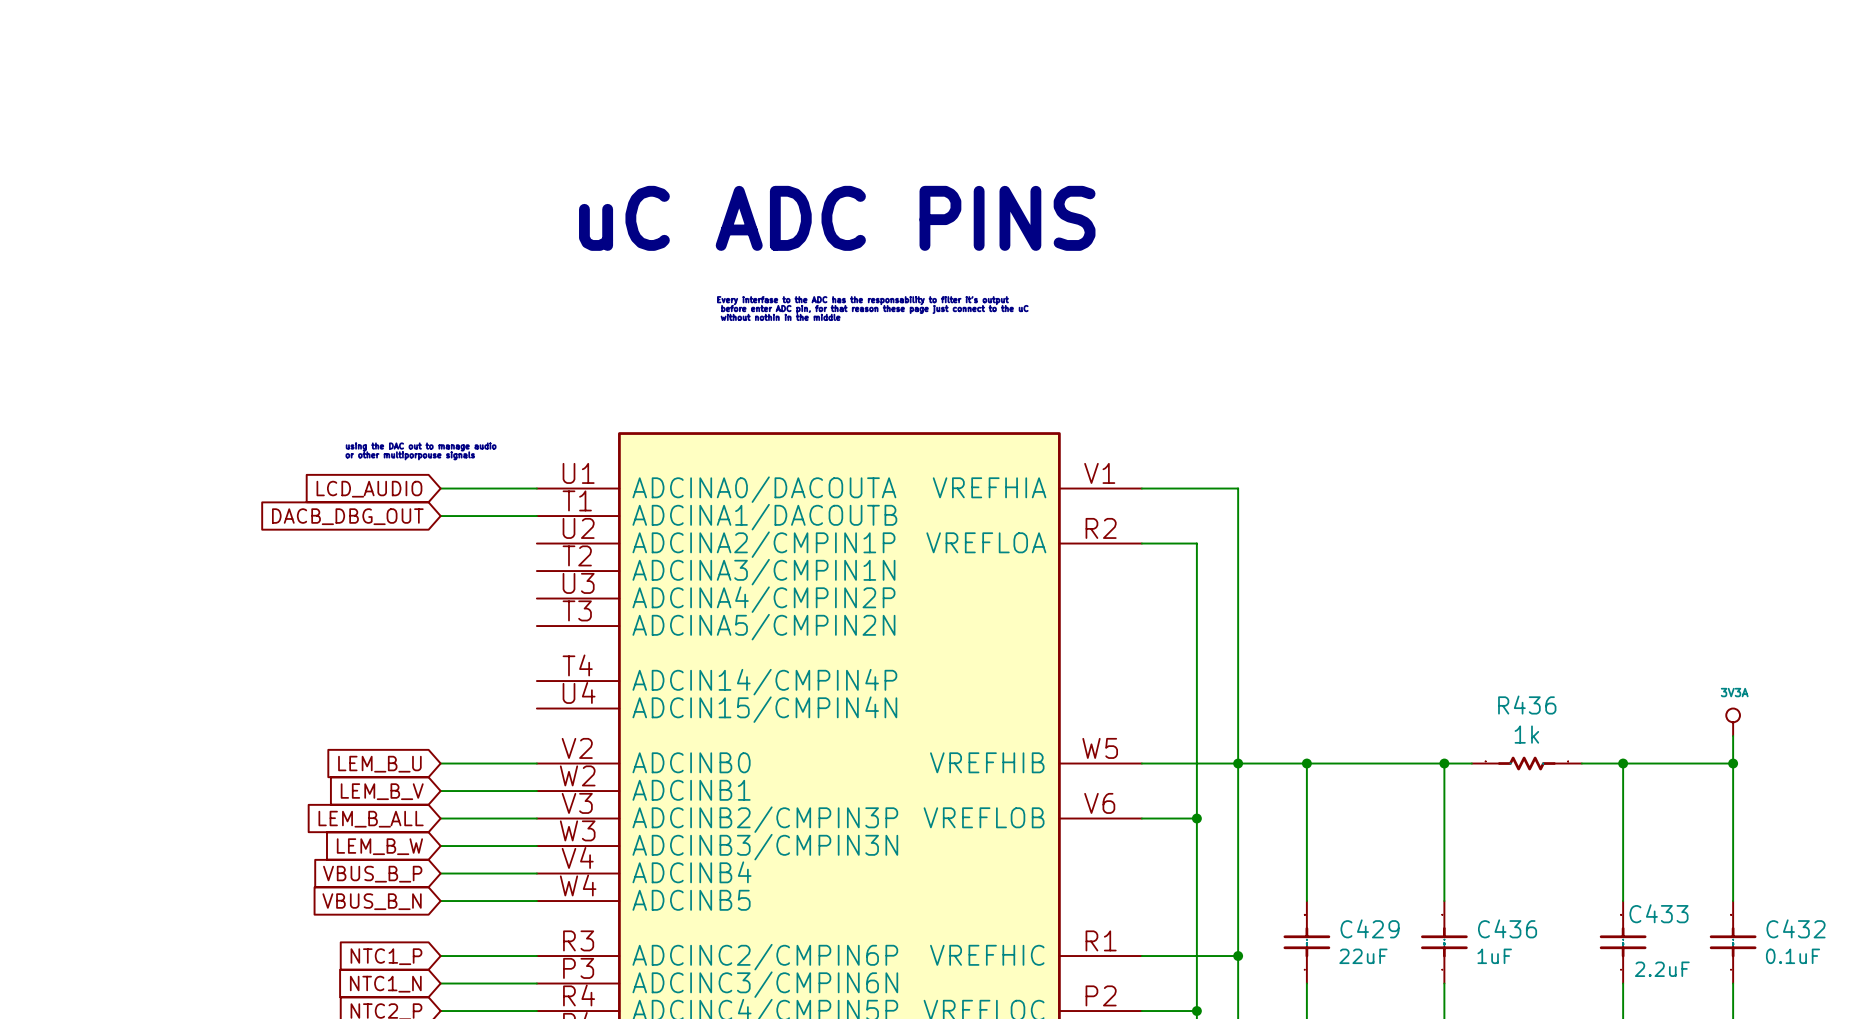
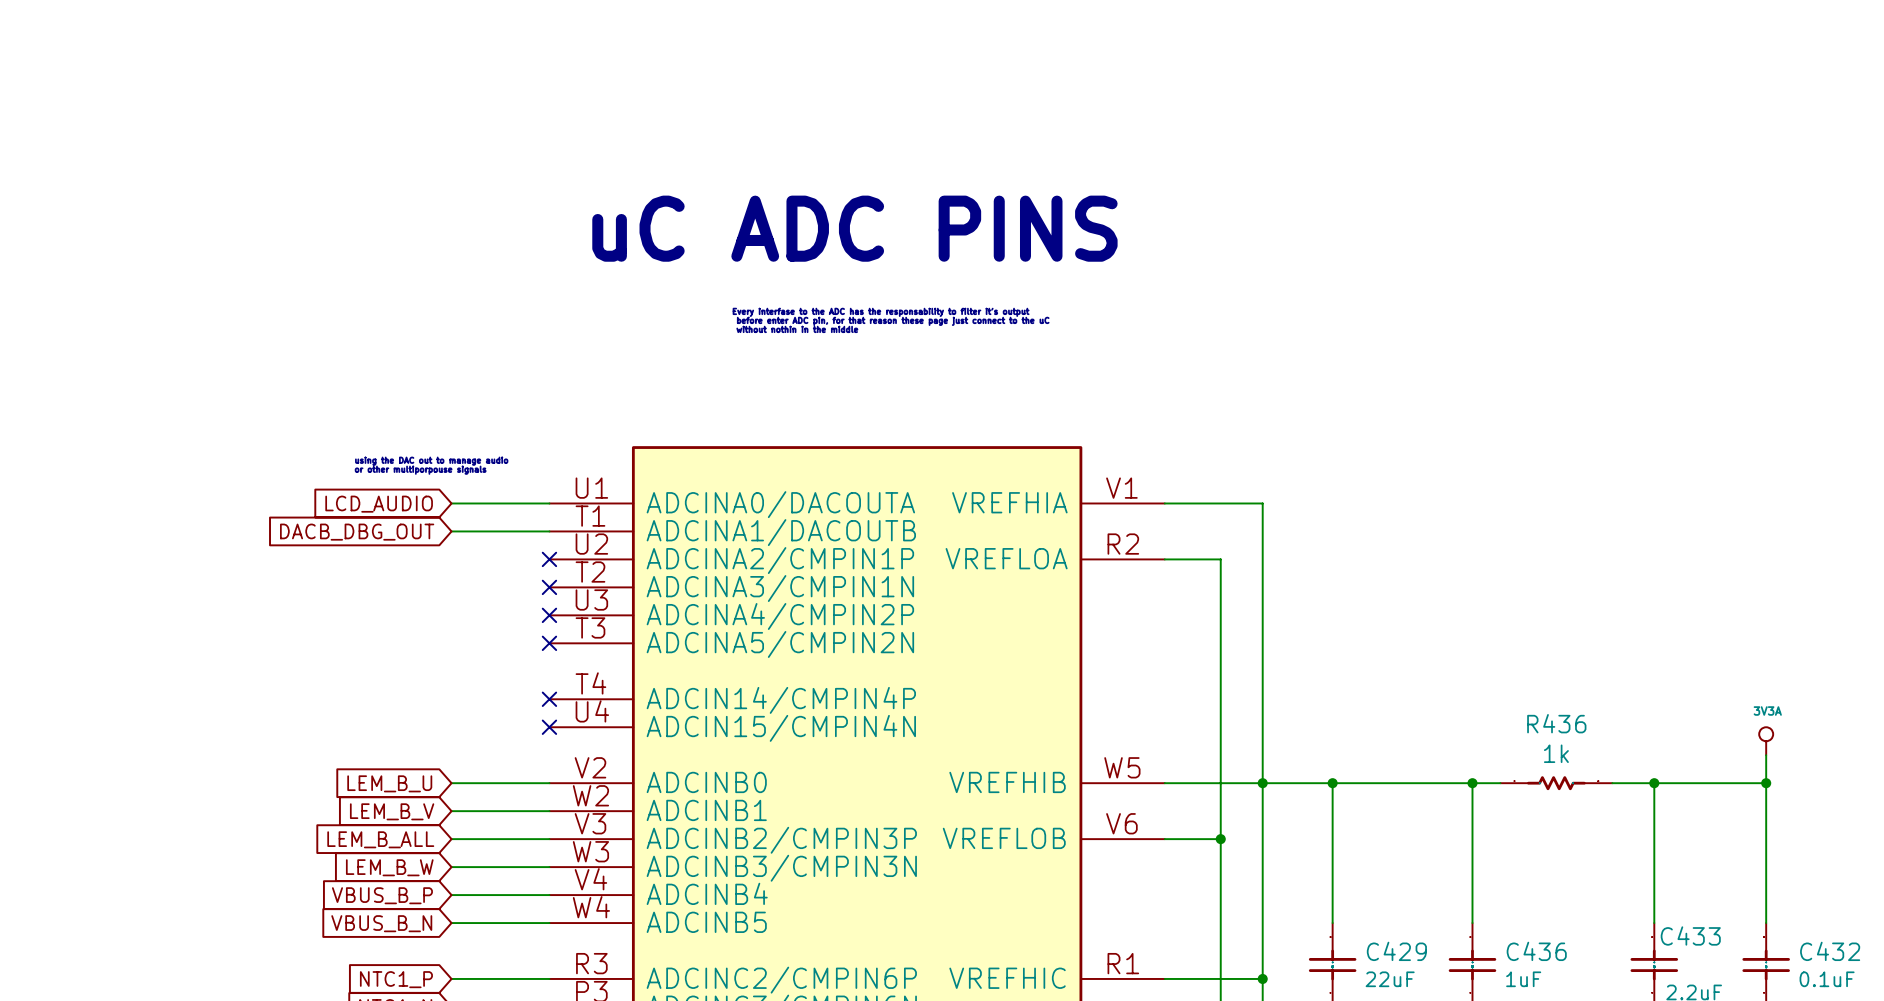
no-connect mark: none -> (549, 559)
no-connect mark: none -> (549, 587)
no-connect mark: none -> (549, 615)
no-connect mark: none -> (549, 643)
no-connect mark: none -> (549, 699)
no-connect mark: none -> (549, 727)

